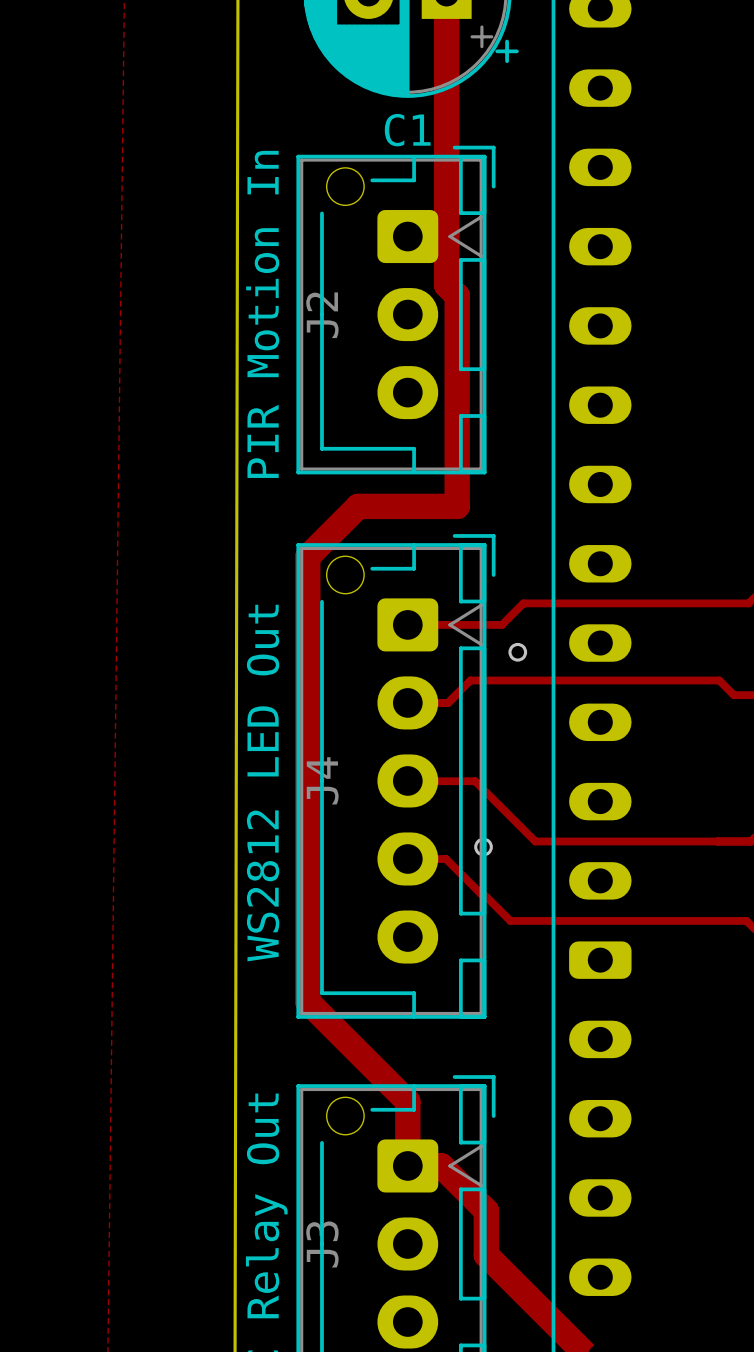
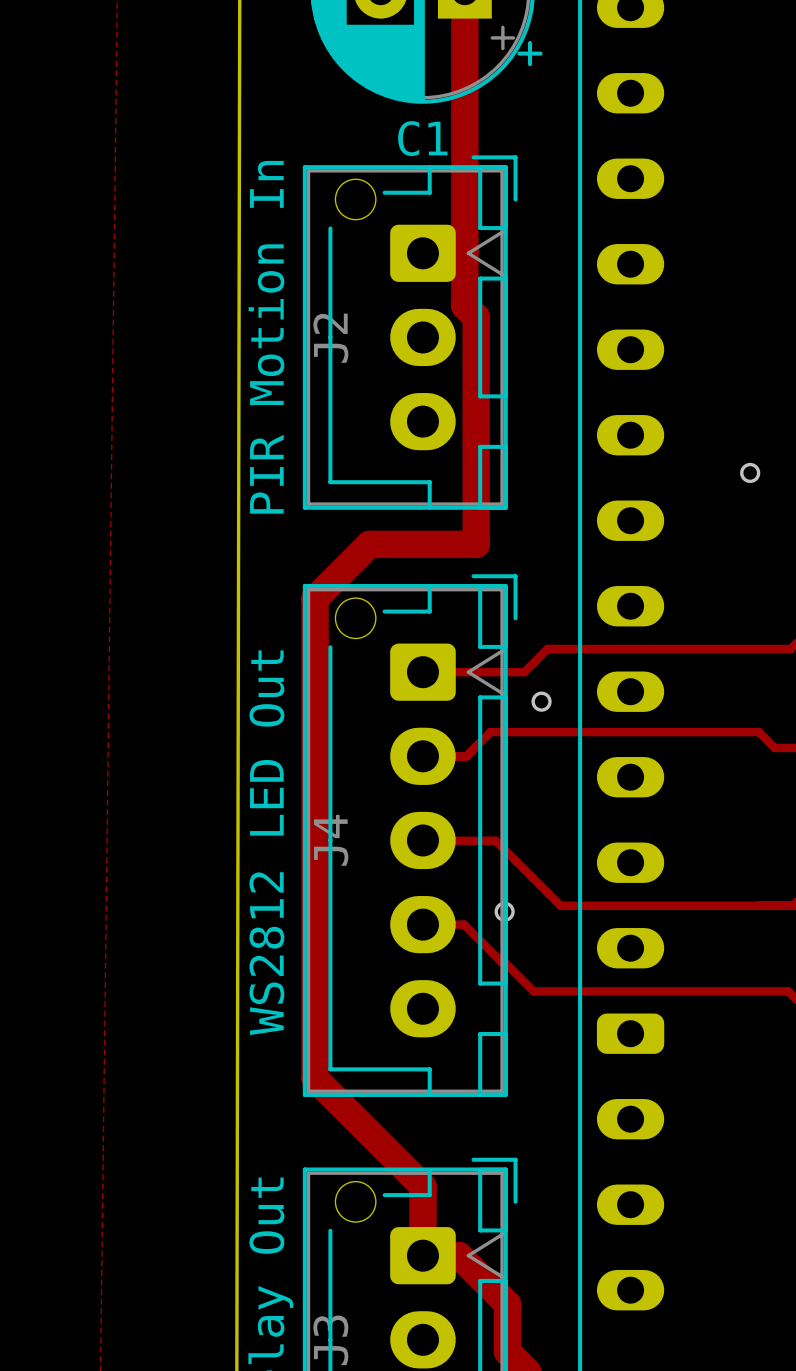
via: none -> (750, 472)

